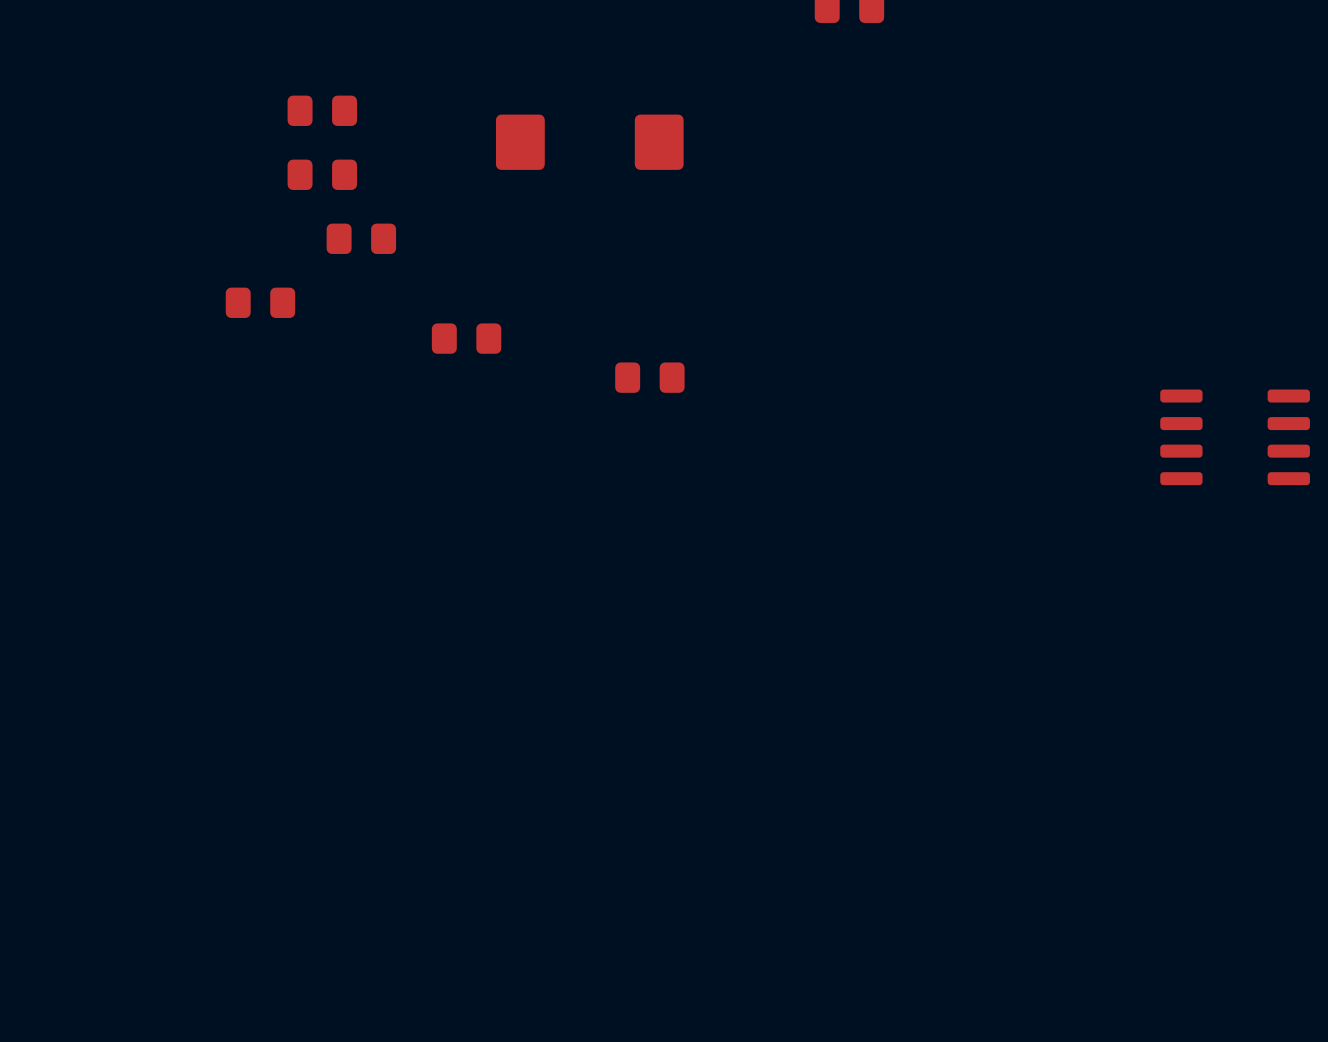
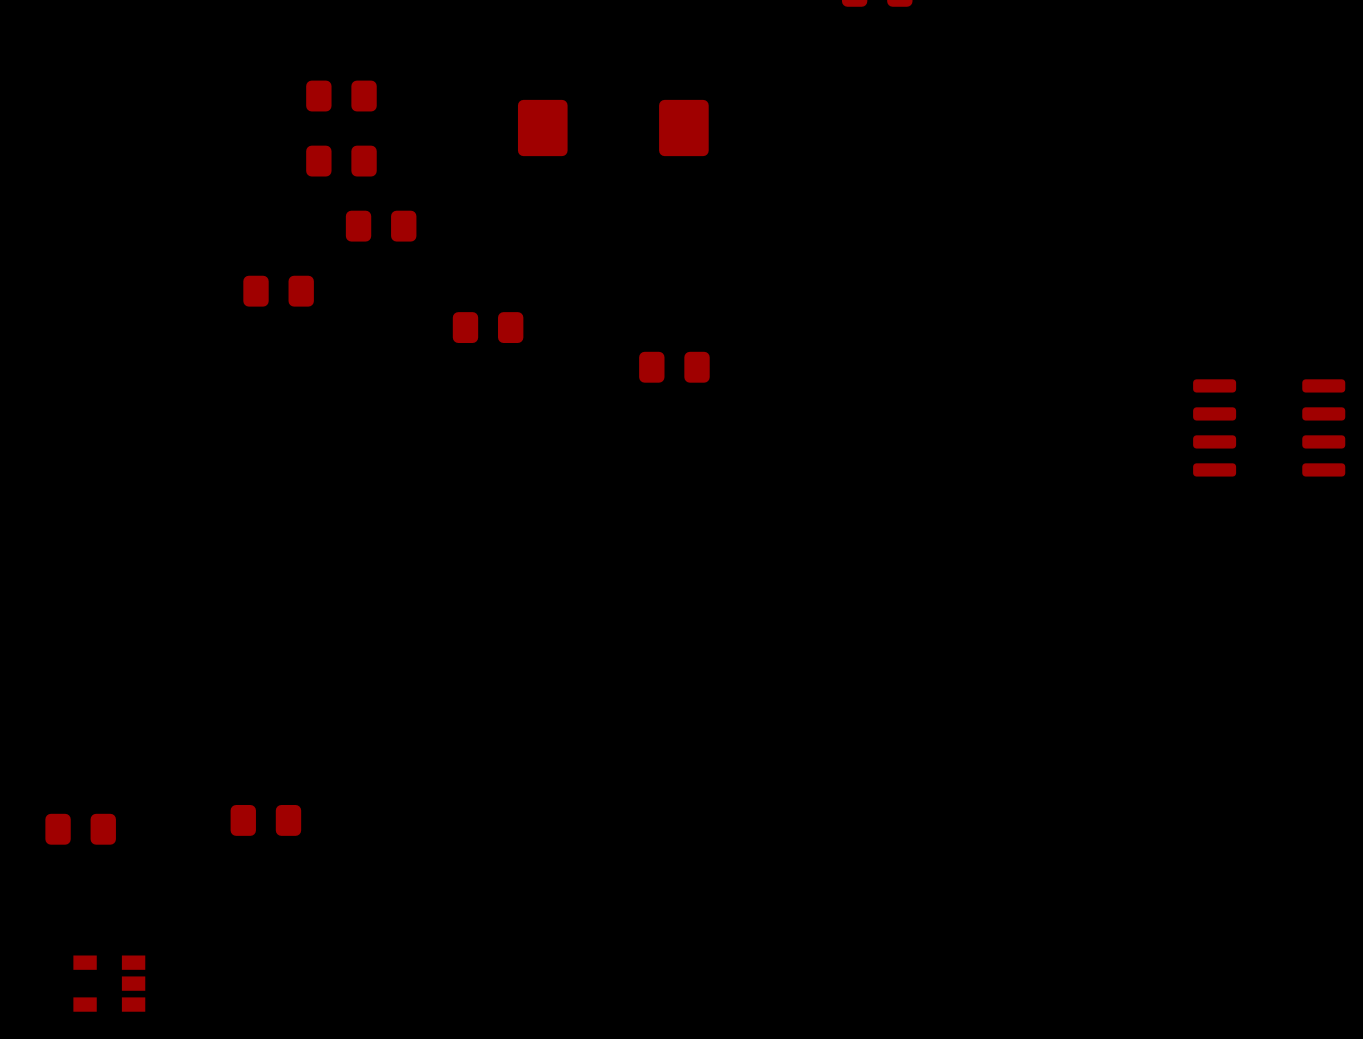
part: none -> (265, 820)
part: none -> (80, 829)
part: none -> (109, 983)

